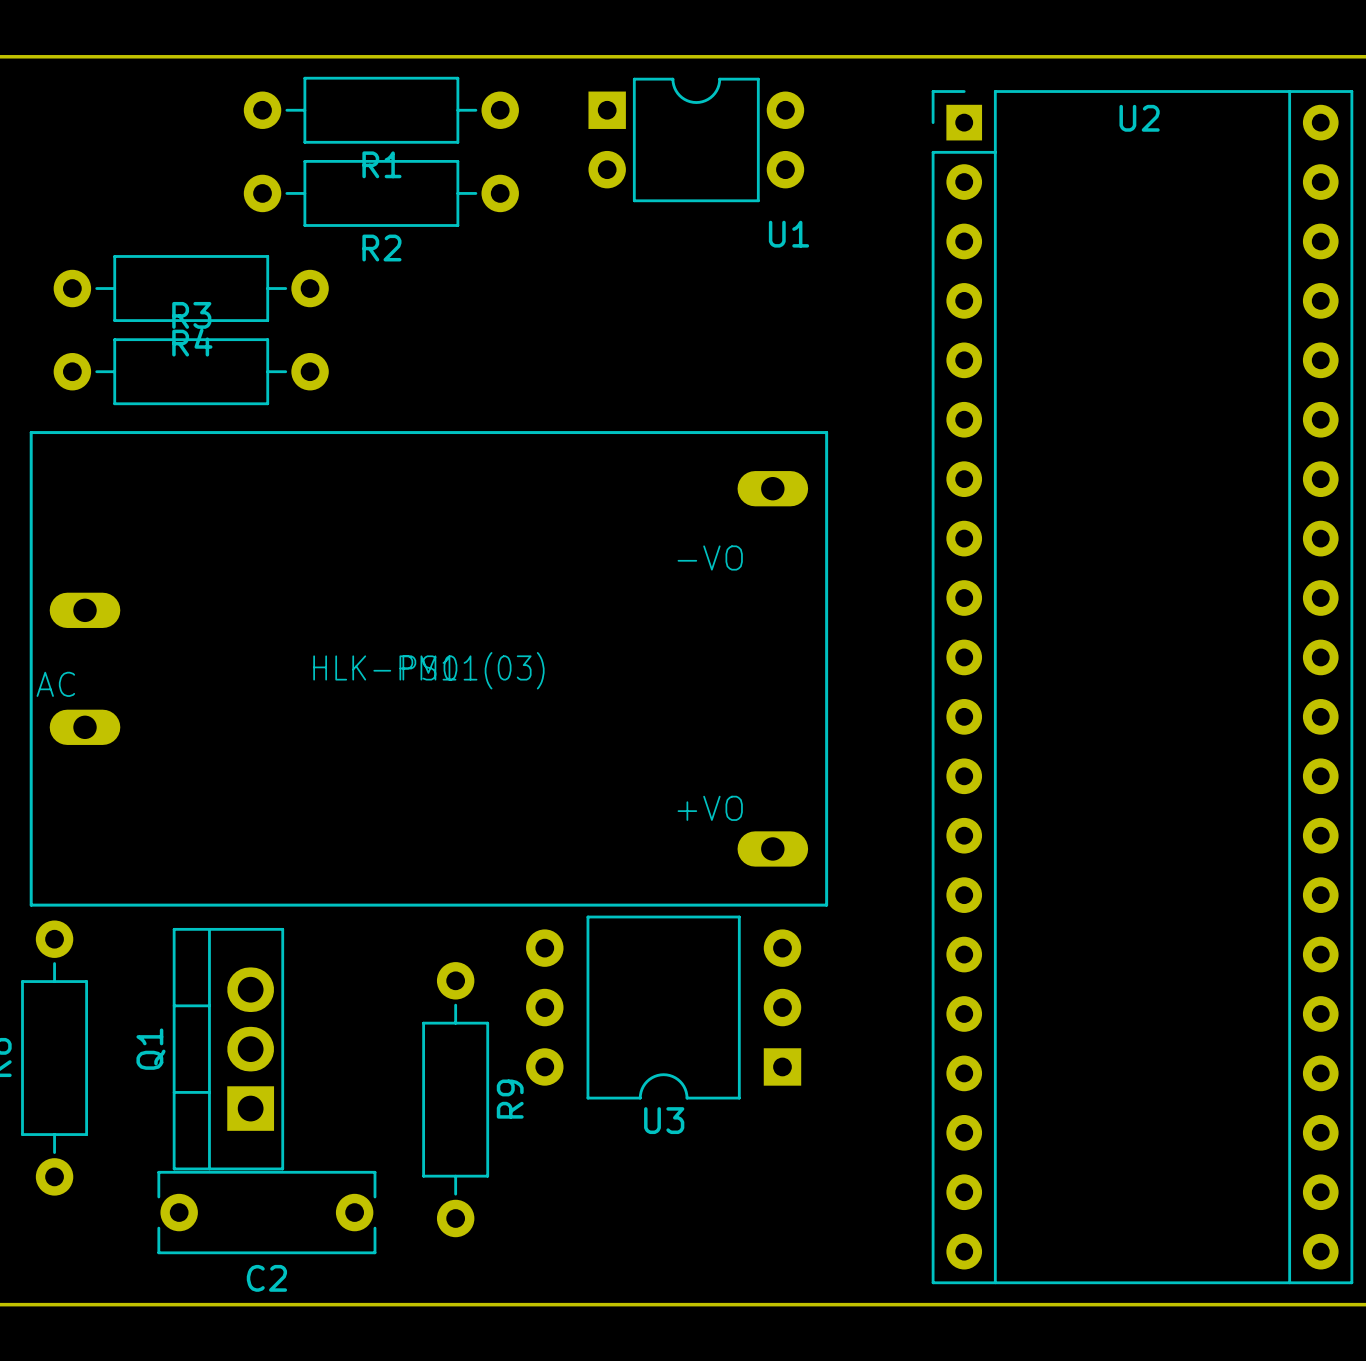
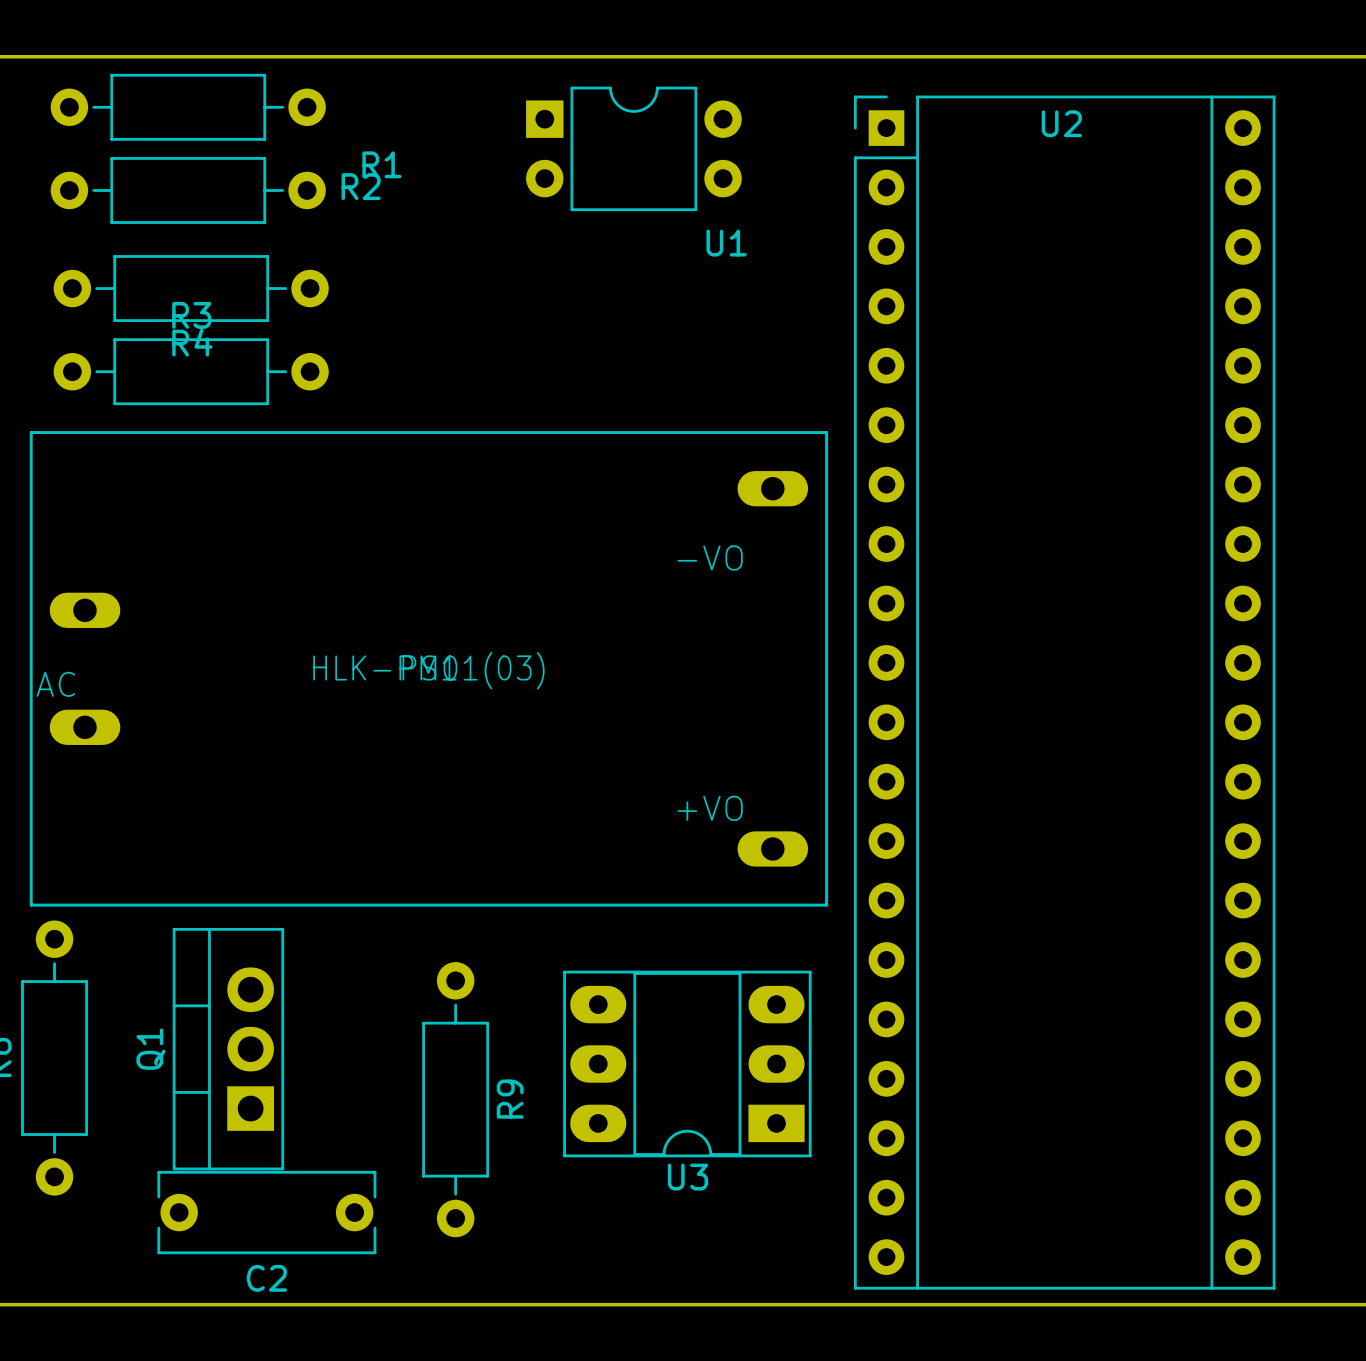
R1 position: (381, 110) -> (188, 107)
U1 position: (696, 139) -> (633, 148)
R2 position: (381, 193) -> (188, 190)
R2 name position: R2 (381, 248) -> R2 (361, 186)
U2 position: (1142, 687) -> (1064, 692)
U3 footprint: [526, 915, 802, 1100] -> [563, 970, 812, 1158]

